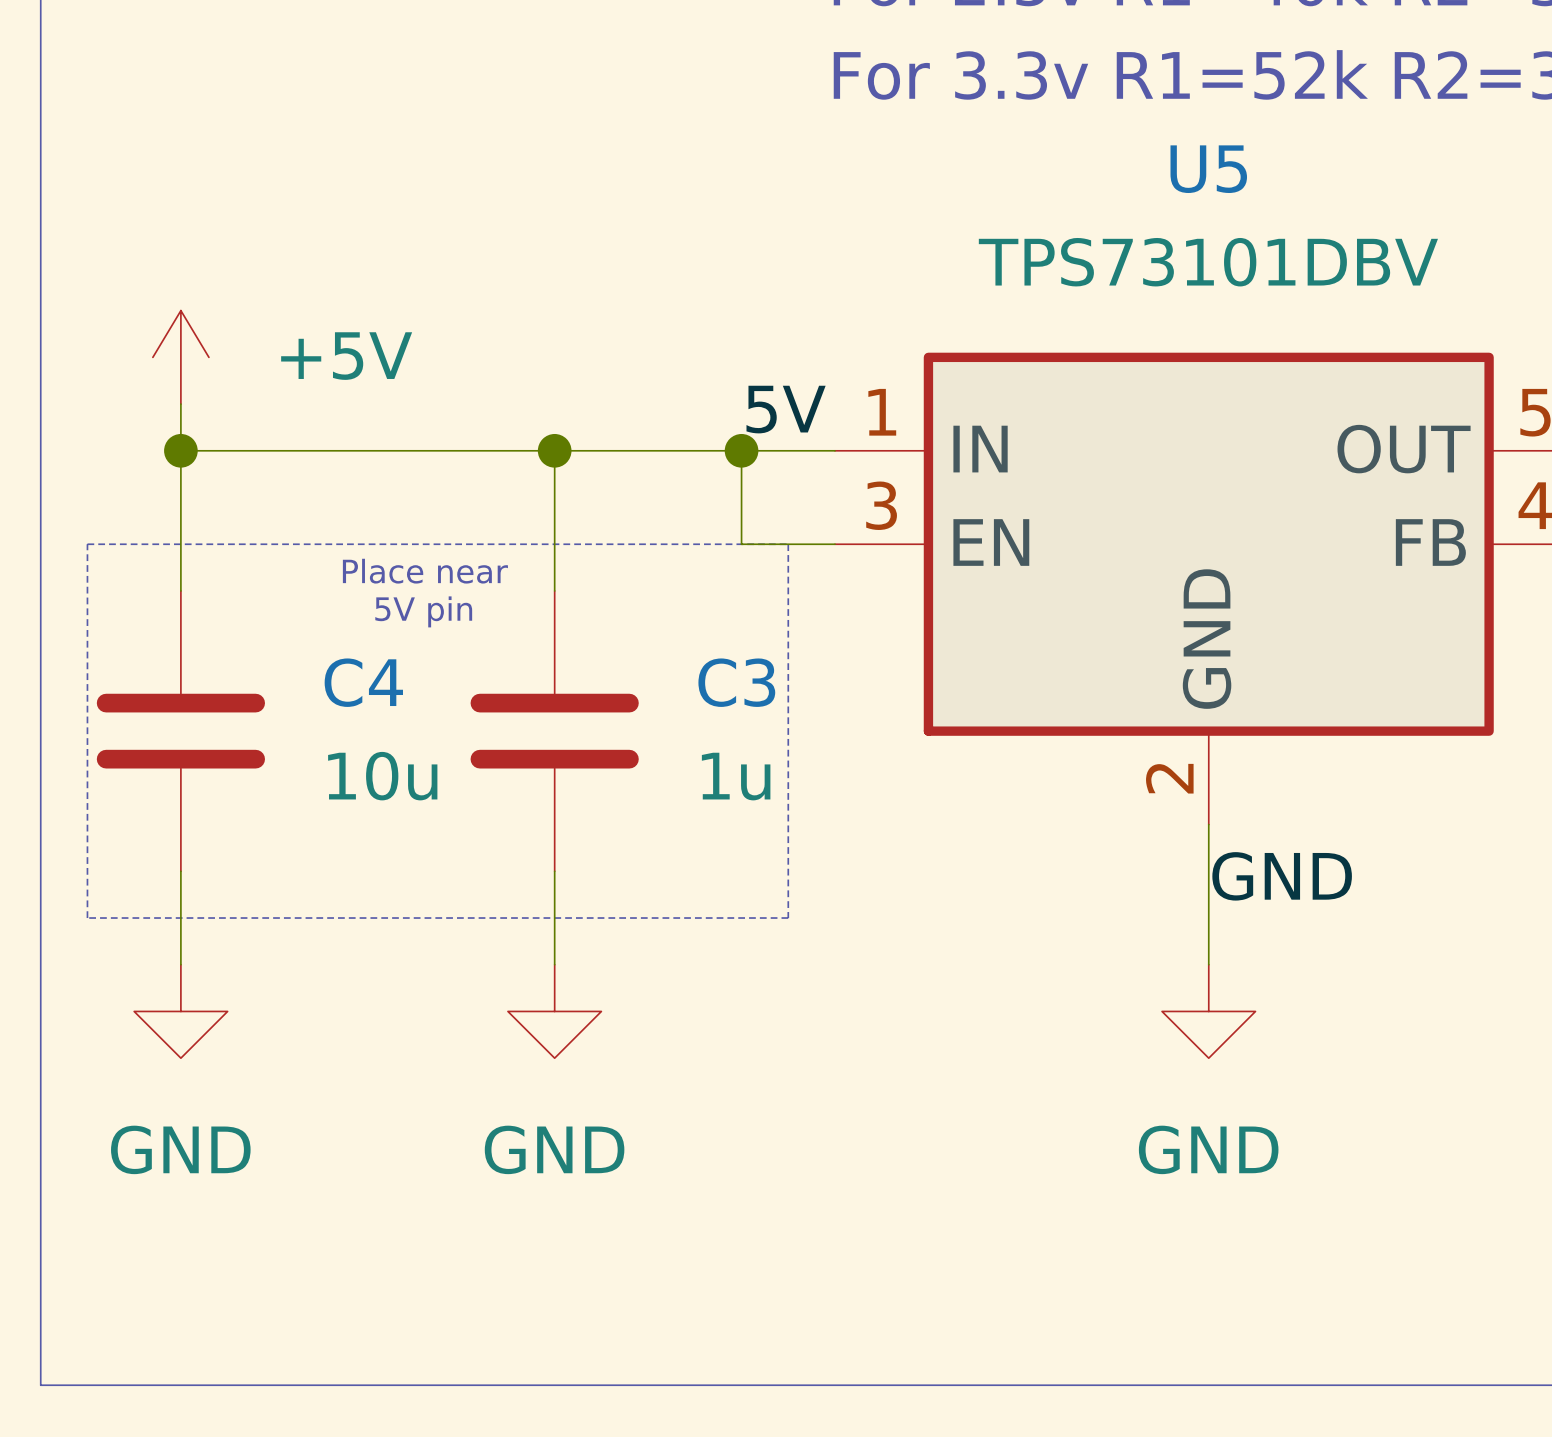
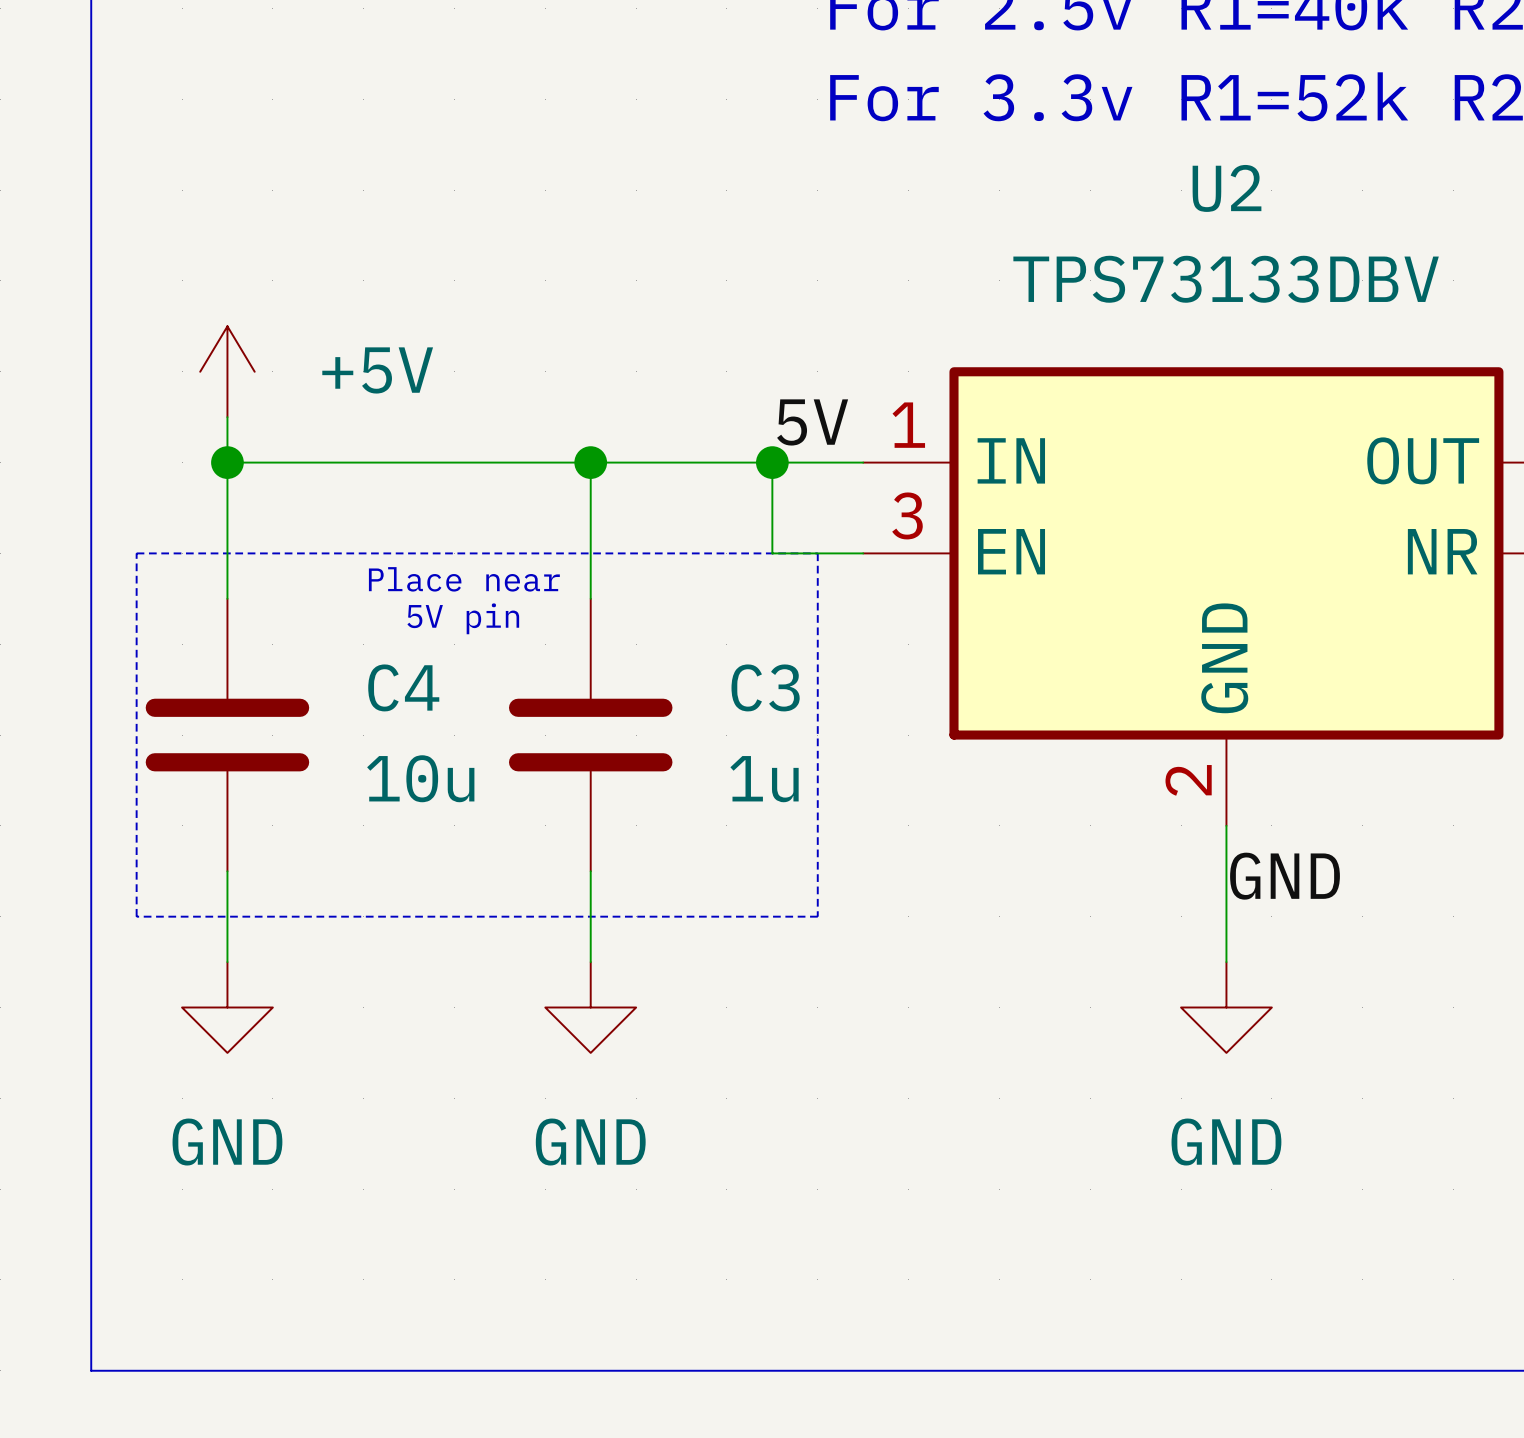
U5 name: U5 (1208, 169) -> U2 (1227, 188)
U5 value: TPS73101DBV (1208, 262) -> TPS73133DBV (1226, 279)
U5 pin name: FB (1430, 542) -> NR (1442, 551)

